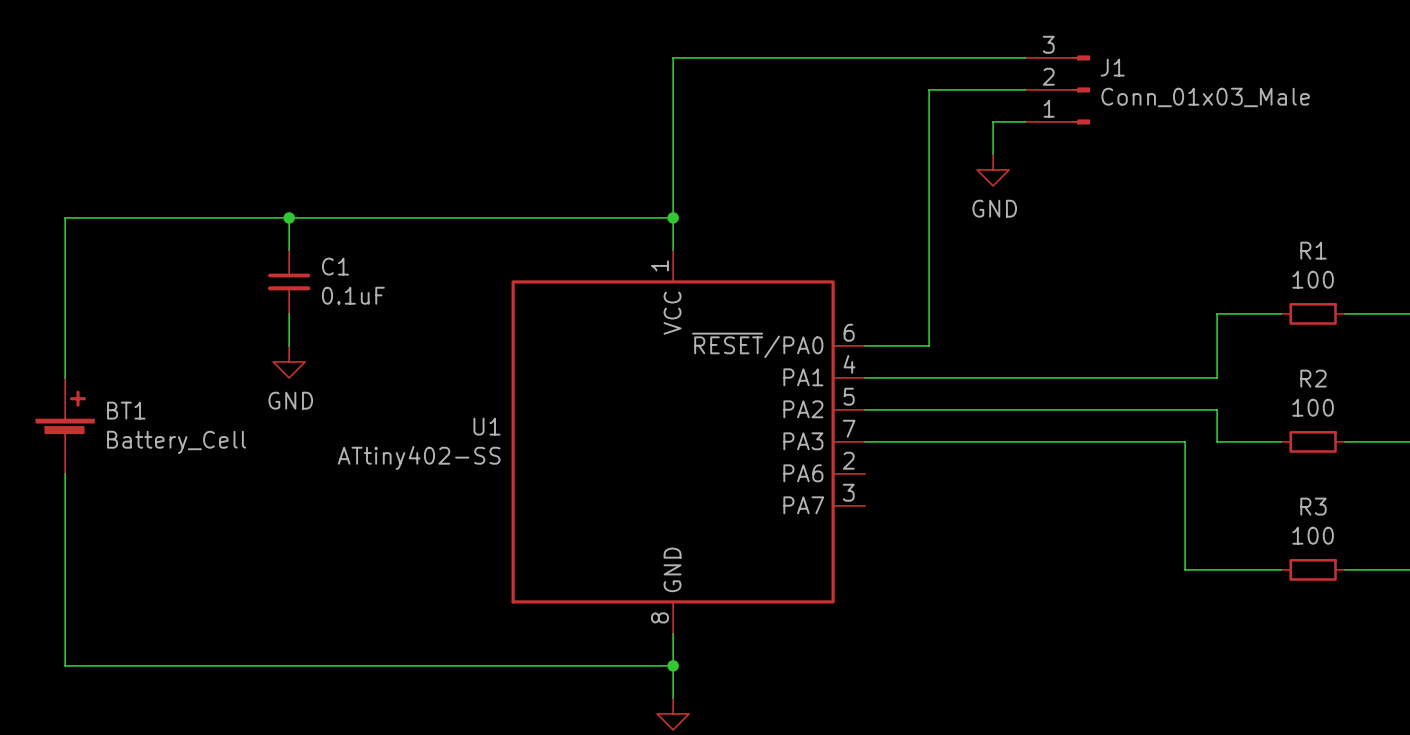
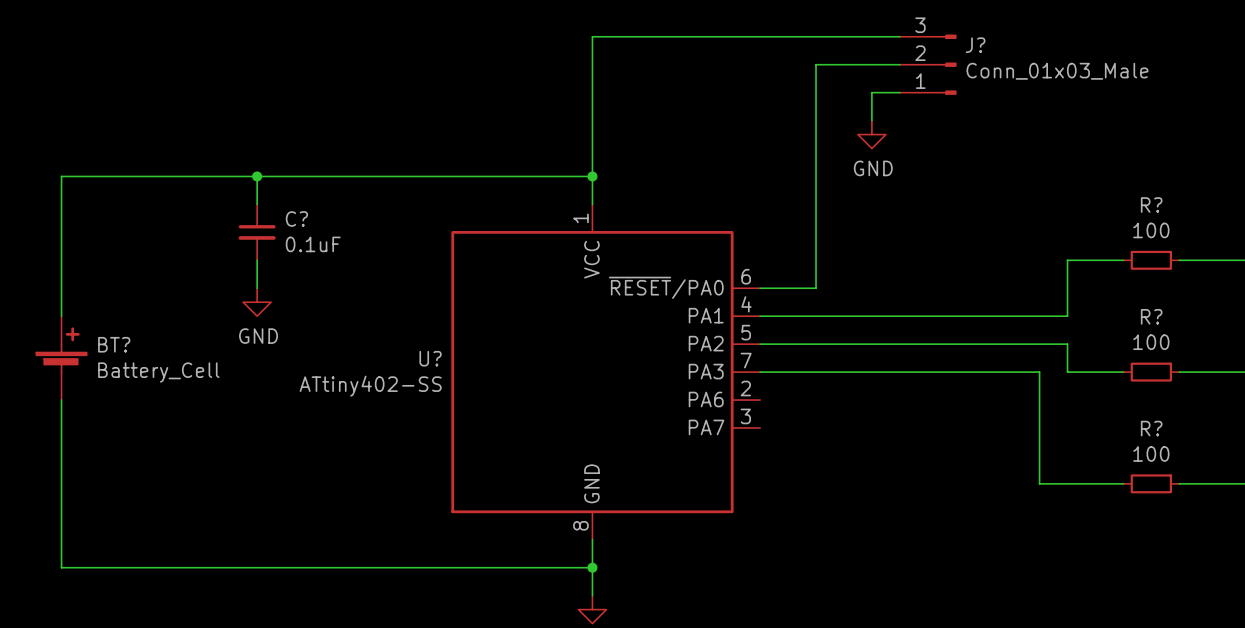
J1 name: J1 (1112, 67) -> J? (975, 45)
R1 name: R1 (1313, 250) -> R? (1151, 205)
C1 name: C1 (335, 266) -> C? (296, 218)
R2 name: R2 (1313, 378) -> R? (1151, 316)
BT1 name: BT1 (126, 410) -> BT? (114, 344)
U1 name: U1 (486, 426) -> U? (430, 358)
R3 name: R3 (1313, 506) -> R? (1151, 428)

